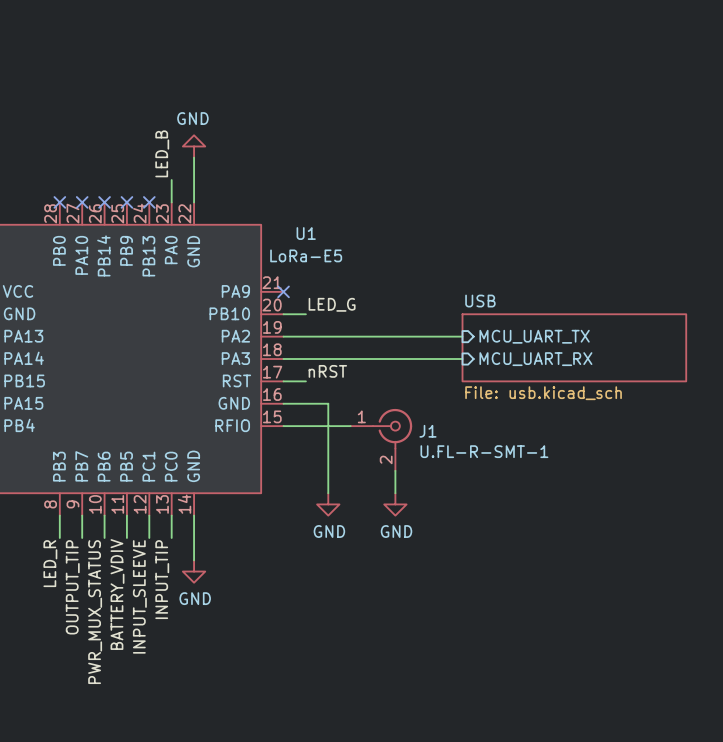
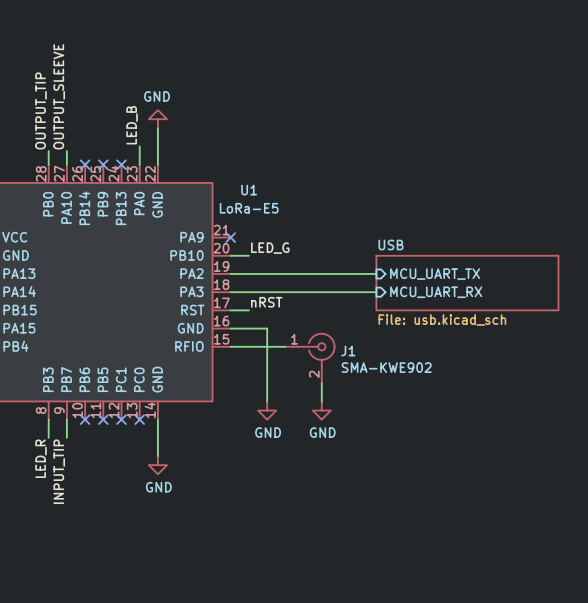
label: none -> OUTPUT_SLEEVE (59, 96)
label: none -> OUTPUT_TIP (41, 110)
wire: none -> (48, 151) (48, 164)
wire: none -> (66, 151) (66, 164)
no-connect mark: (59, 202) -> none
no-connect mark: (82, 202) -> none
J1 value: U.FL-R-SMT-1 (484, 451) -> SMA-KWE902 (386, 367)
wire: (104, 515) (104, 537) -> none
no-connect mark: none -> (85, 419)
wire: (126, 515) (126, 537) -> none
no-connect mark: none -> (103, 419)
wire: (149, 515) (149, 537) -> none
no-connect mark: none -> (121, 419)
wire: (171, 515) (171, 537) -> none
no-connect mark: none -> (139, 419)
label: INPUT_TIP (162, 579) -> none
label: OUTPUT_TIP (72, 587) -> INPUT_TIP (59, 471)
label: BATTERY_VDIV (117, 594) -> none
label: INPUT_SLEEVE (139, 596) -> none
label: PWR_MUX_STATUS (95, 612) -> none

